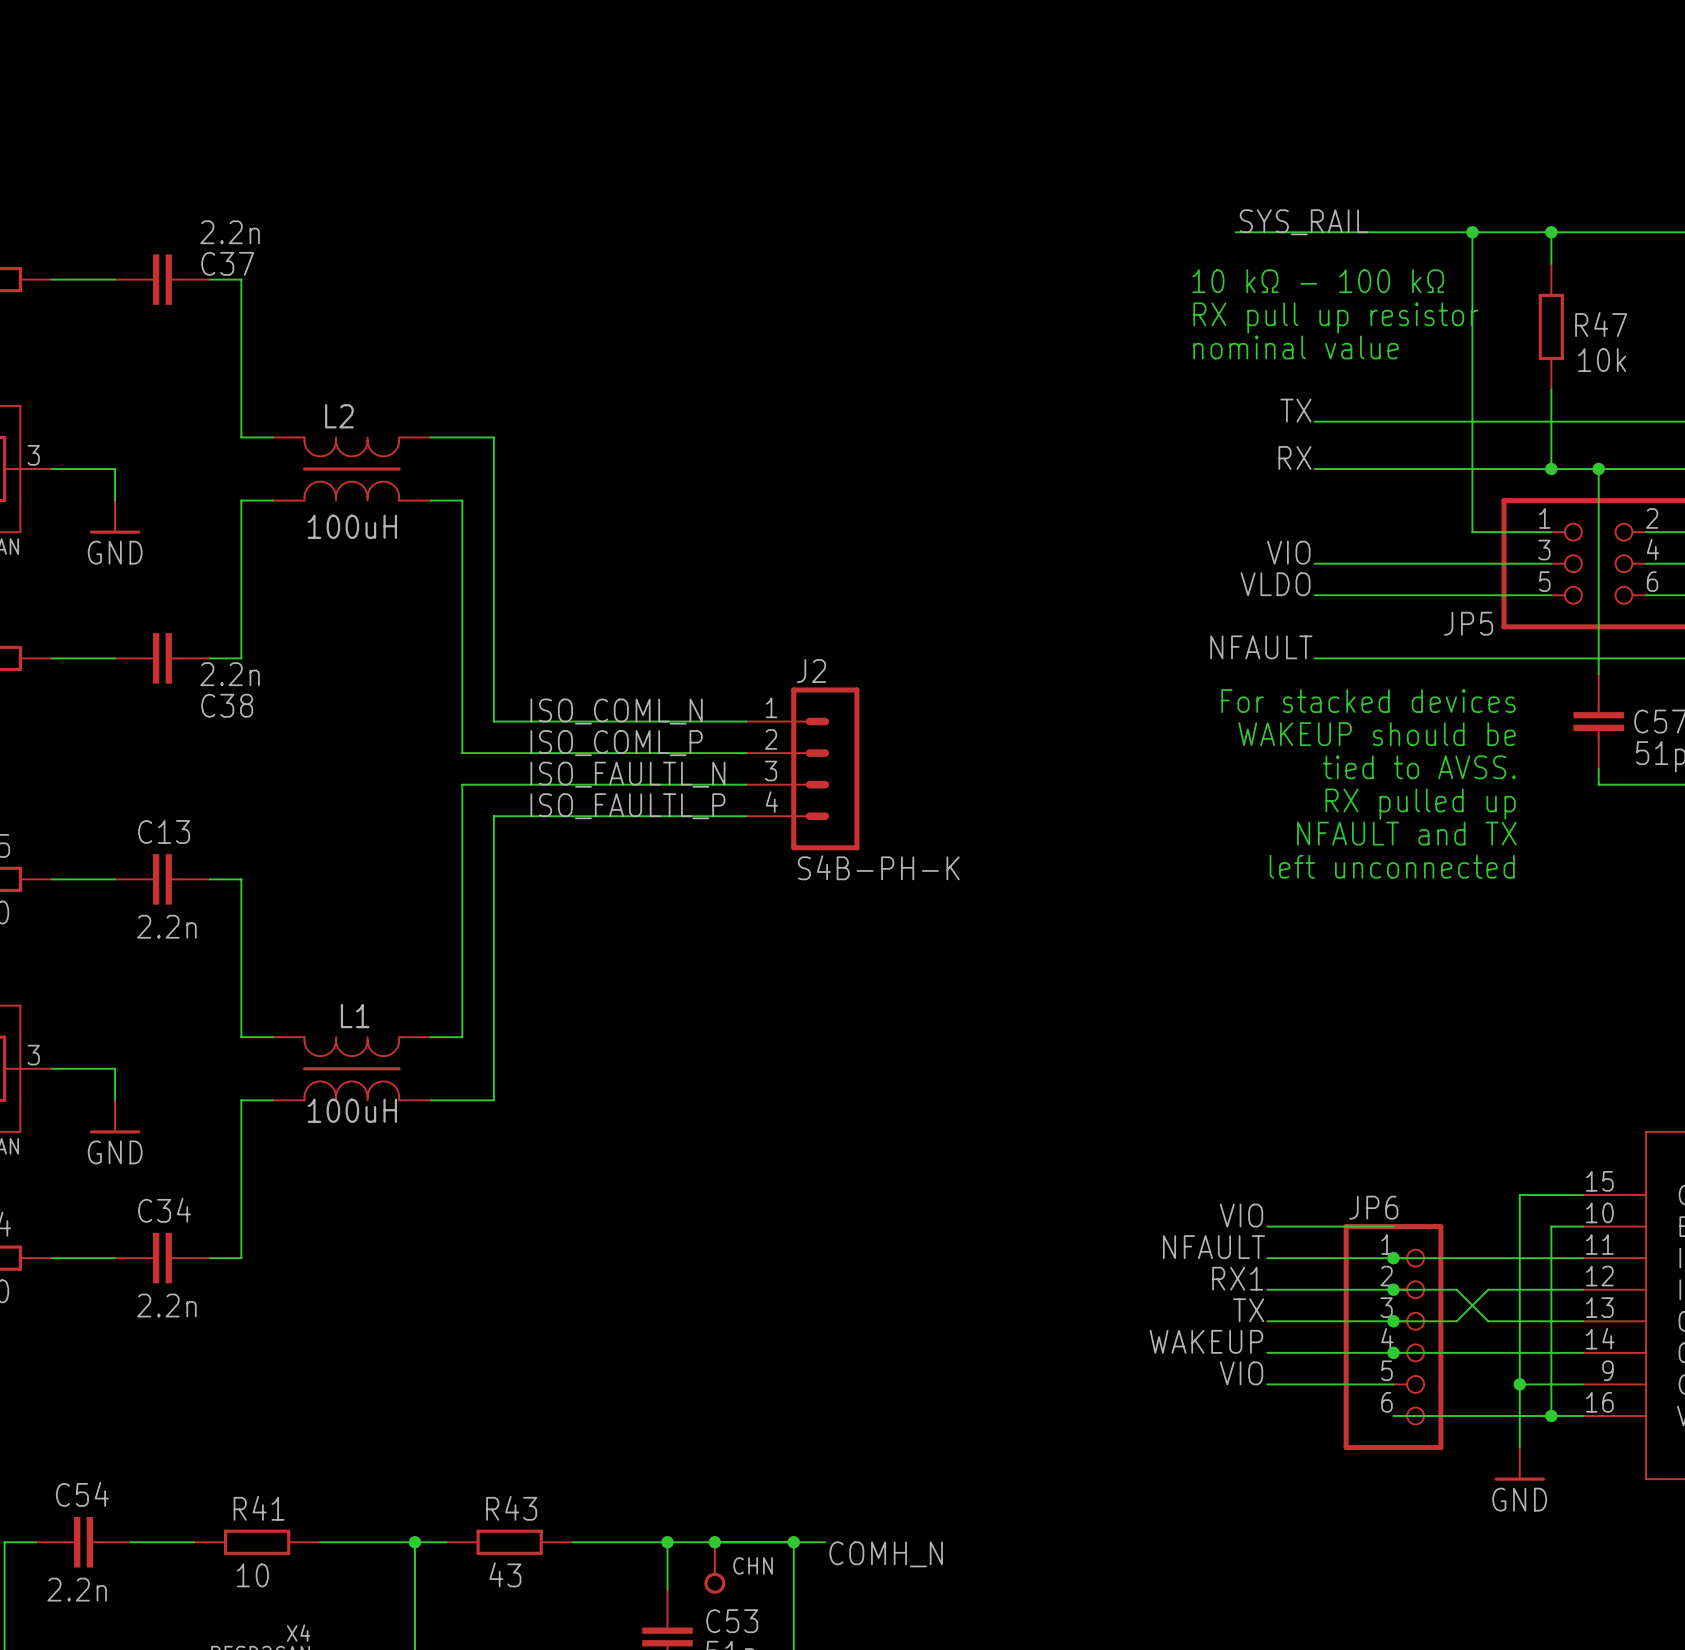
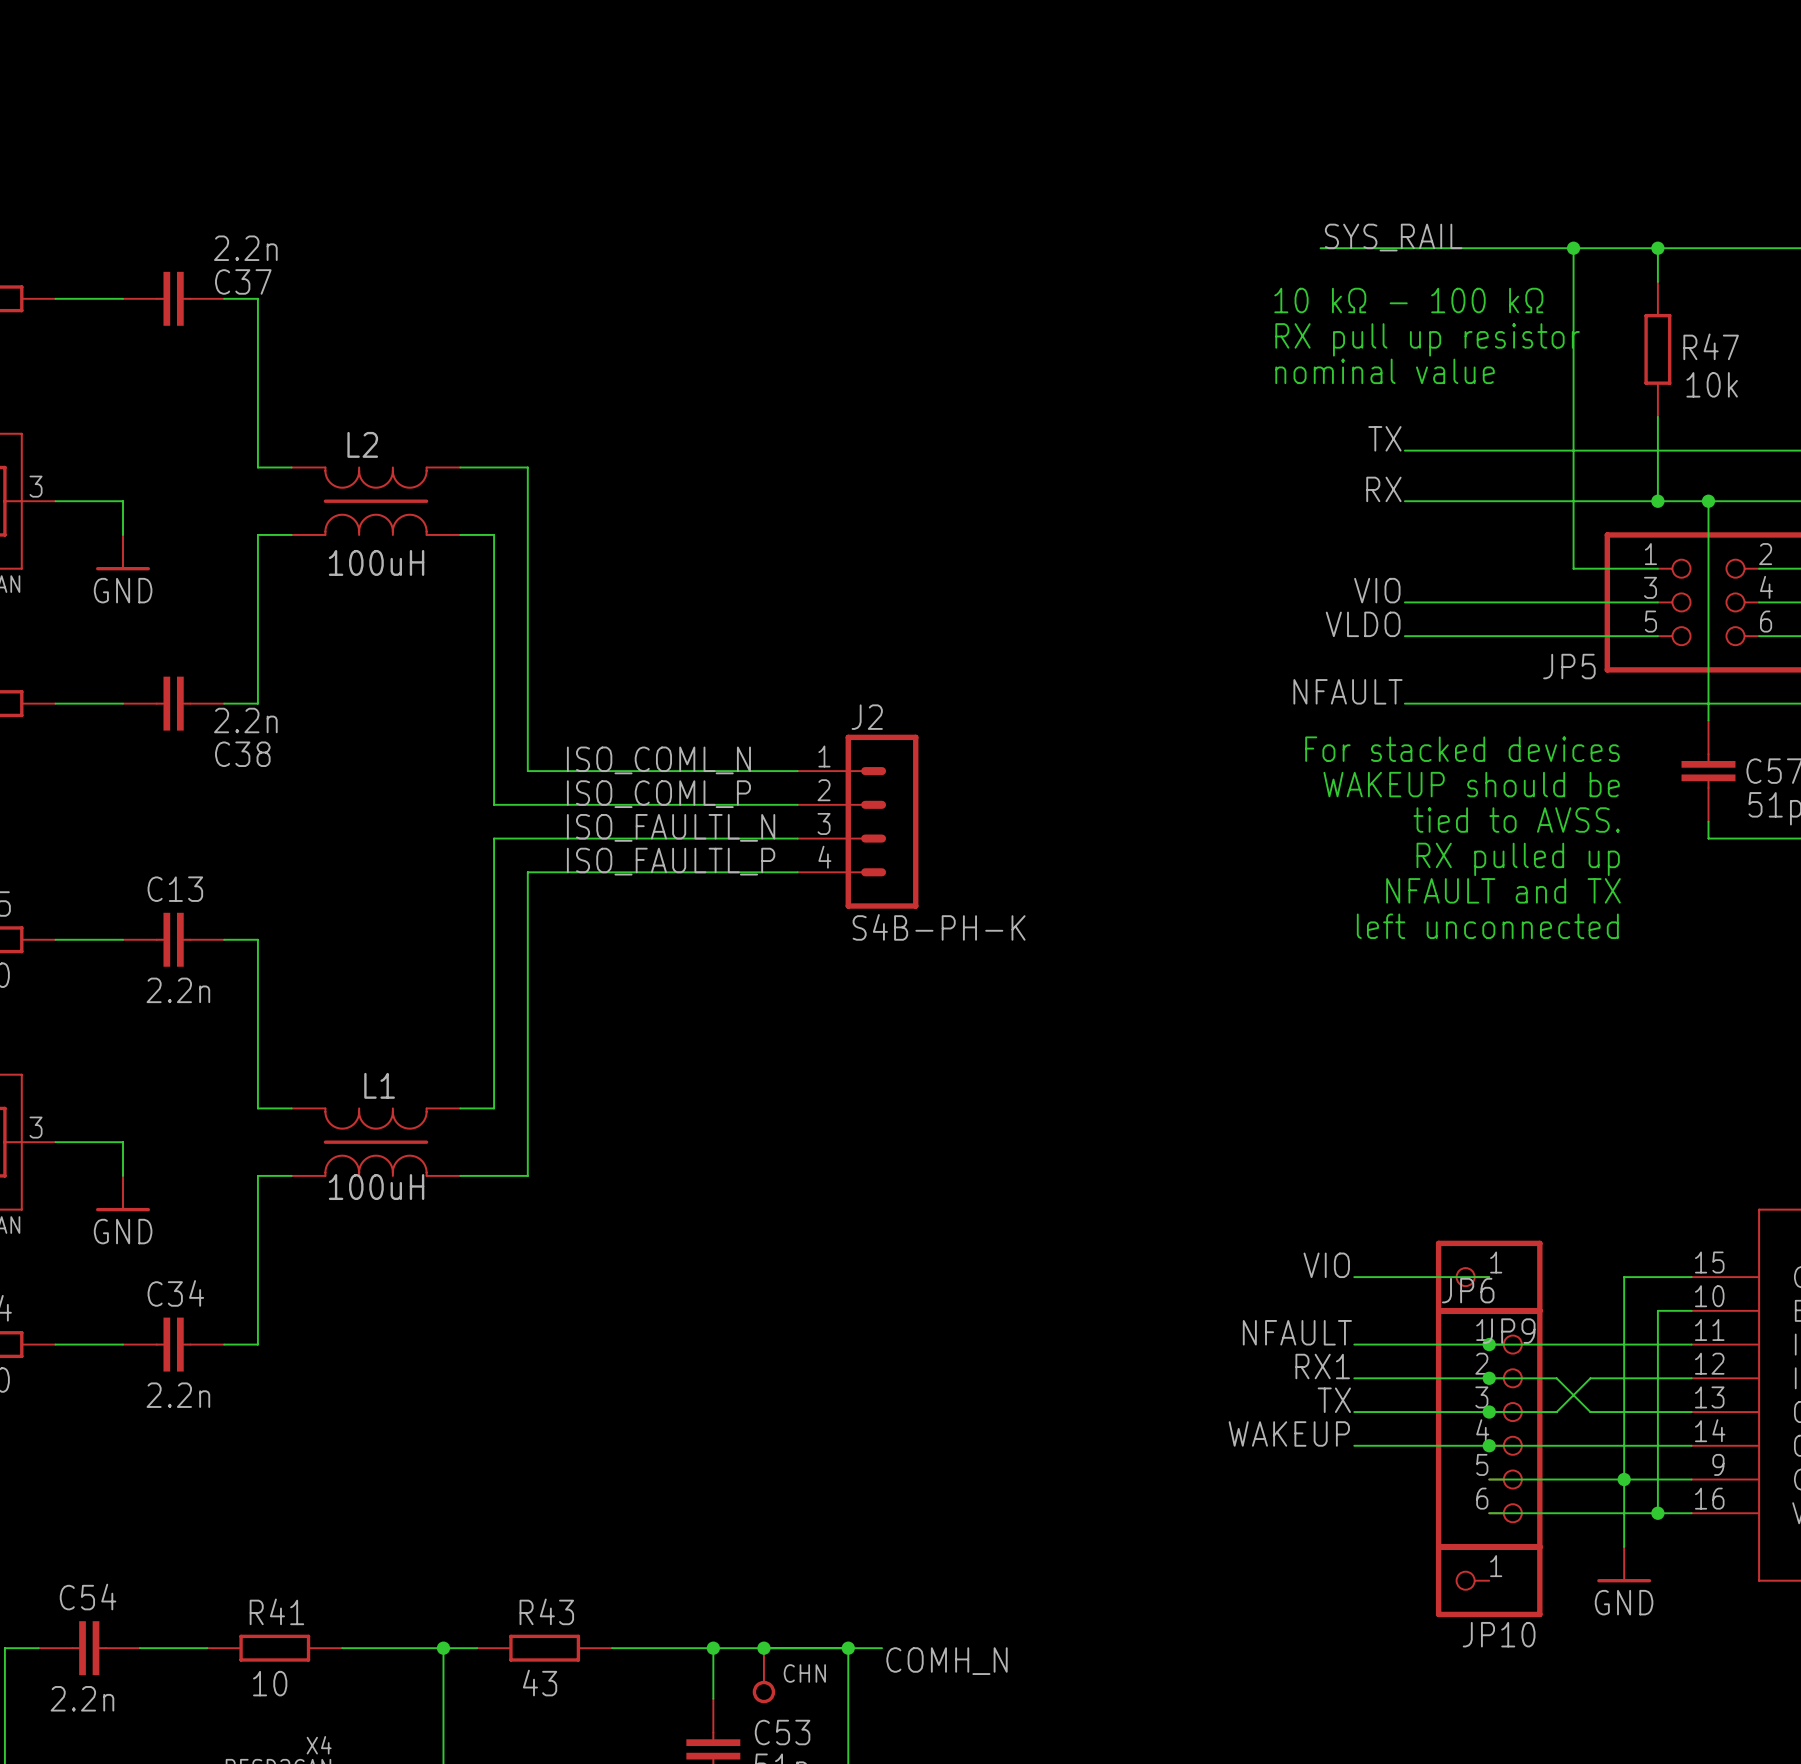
JP9: none -> (1489, 1277)
label position: VIO (1241, 1215) -> VIO (1326, 1265)
wire: (1267, 1226) (1393, 1226) -> (1354, 1277) (1489, 1277)
label: VIO (1241, 1373) -> none
wire: (1267, 1384) (1393, 1384) -> (1624, 1479) (1489, 1479)
JP10: none -> (1489, 1580)

